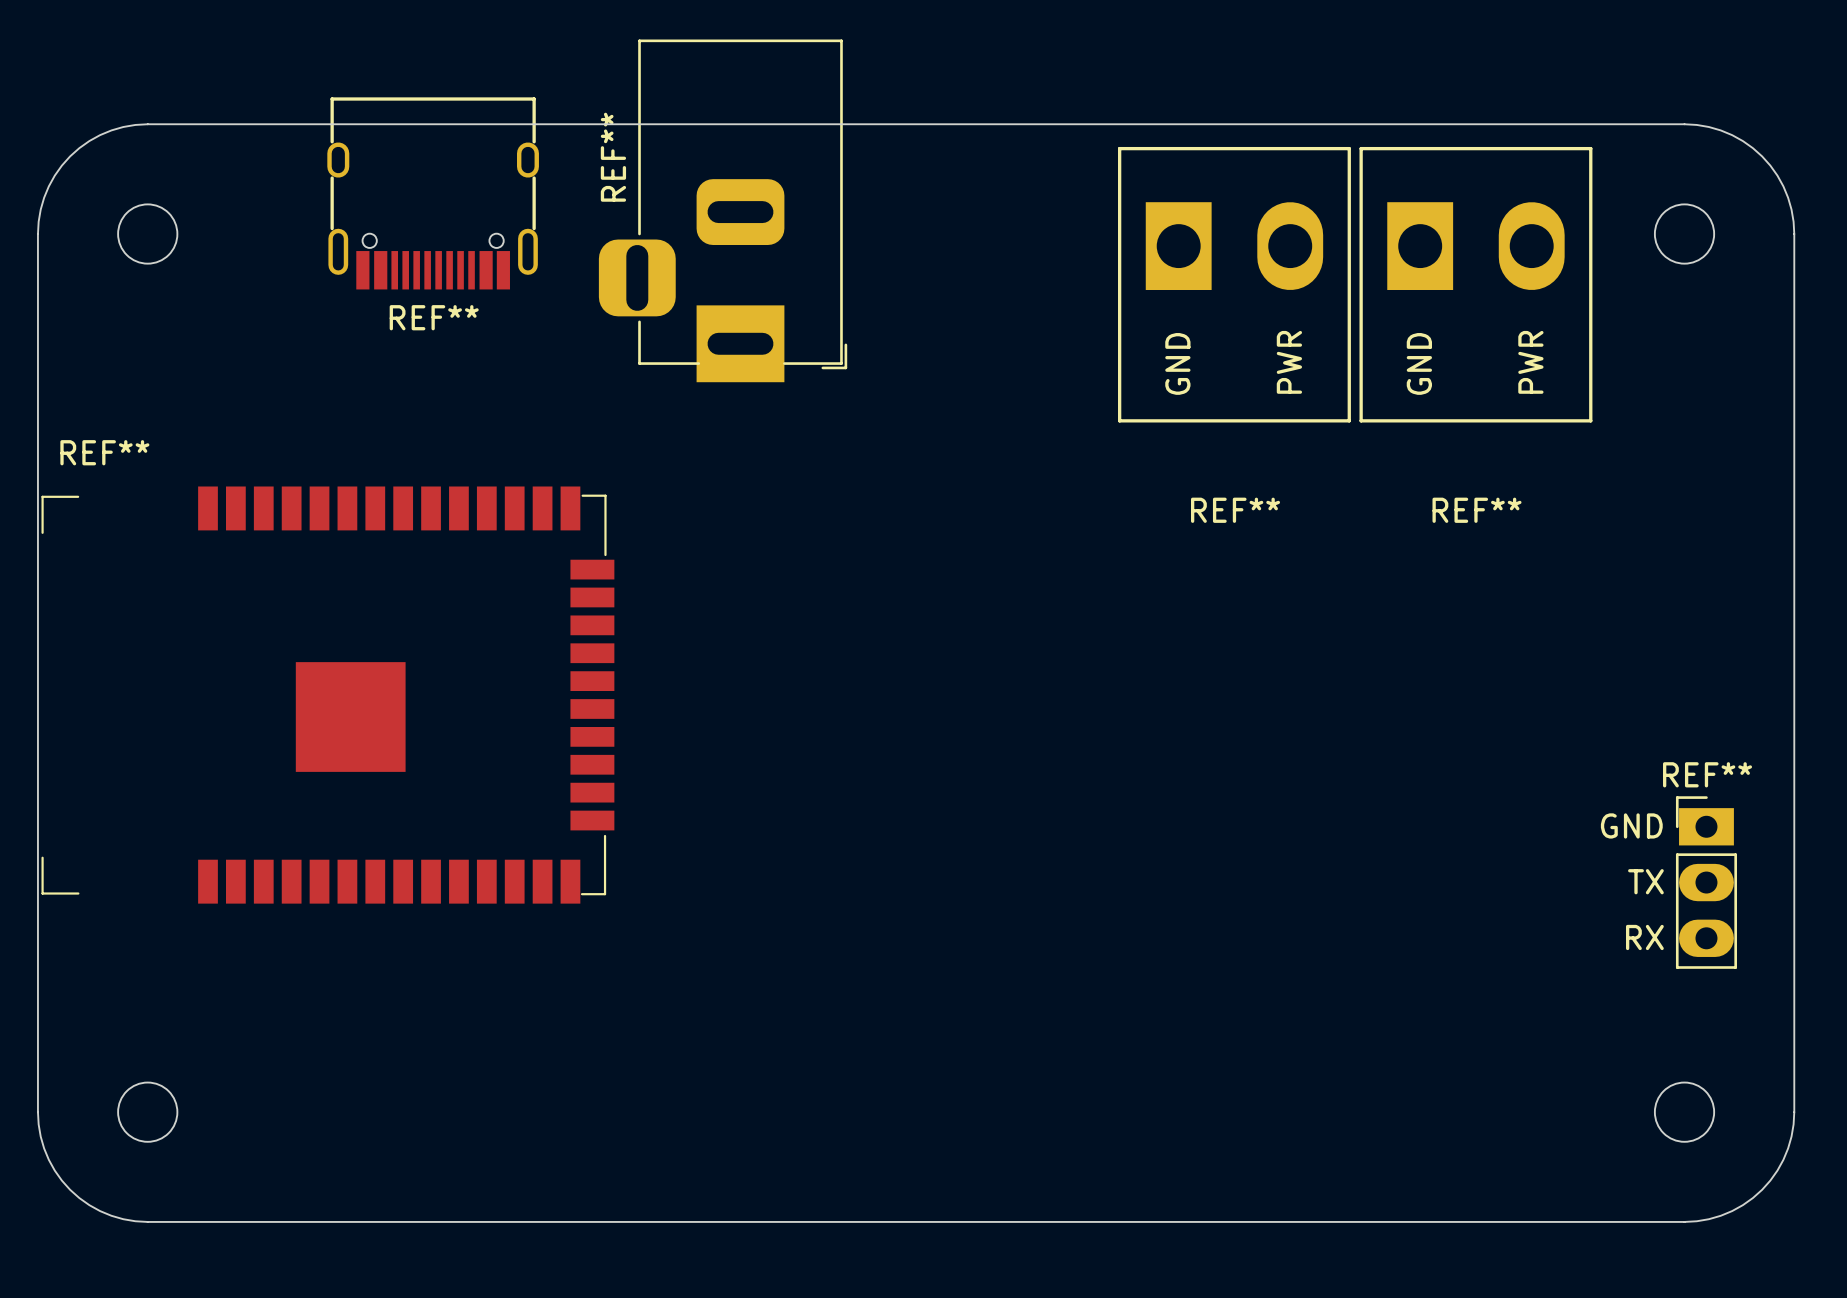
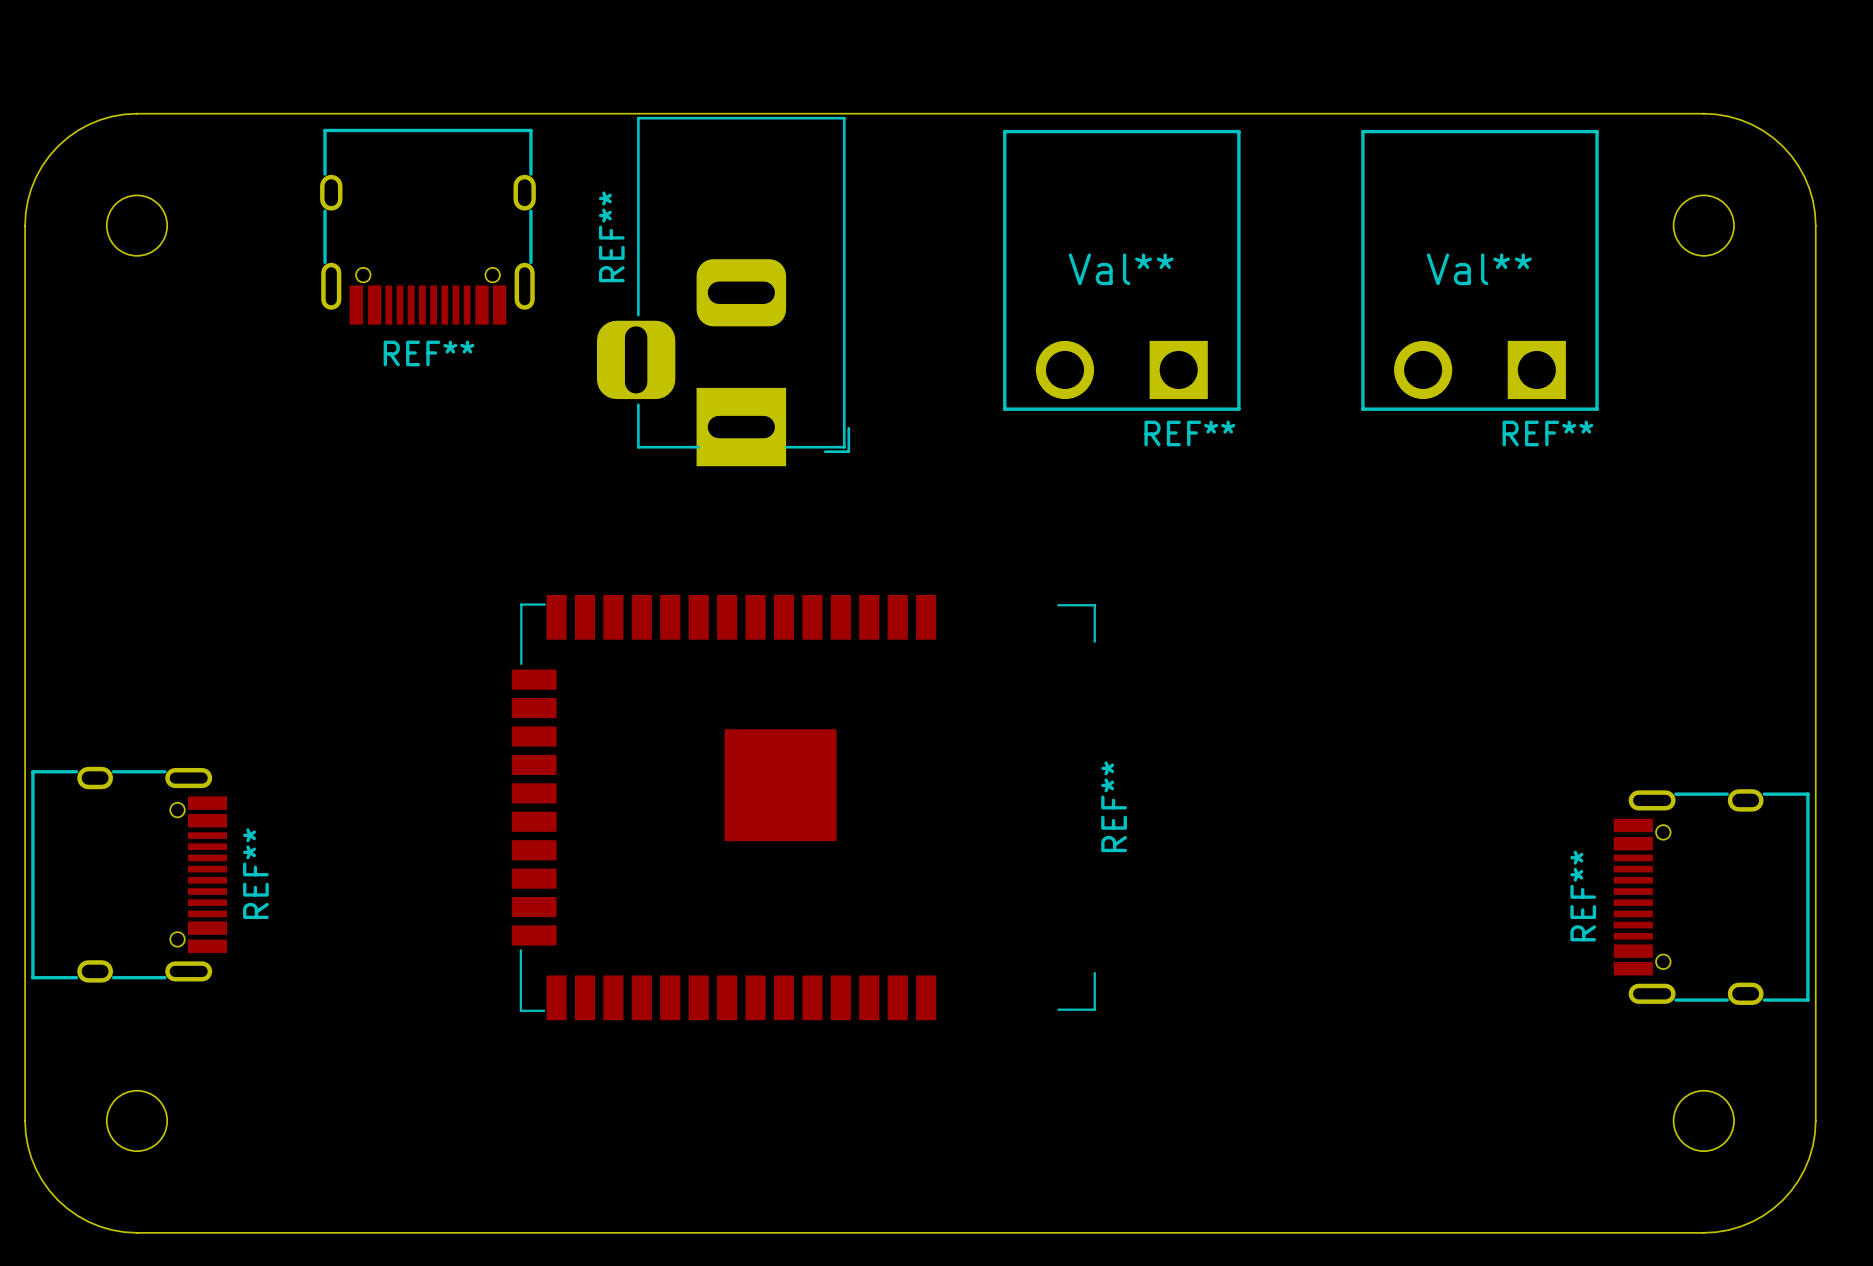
REF** footprint: [1359, 146, 1593, 423] -> [1361, 129, 1599, 411]
REF** position: (433, 193) -> (427, 226)
REF** position: (723, 210) -> (723, 291)
REF** value: none -> Val** (1479, 269)
REF**: none -> Val** (1121, 270)
REF**: (1234, 284) -> none
REF** name position: REF** (104, 452) -> REF** (1114, 806)
REF** name position: REF** (1477, 510) -> REF** (1547, 433)
REF** rotation: 0° (327, 695) -> 180° (803, 807)
REF** position: (327, 695) -> (803, 807)
REF** name position: REF** (1707, 774) -> REF** (1583, 896)
REF** footprint: [1675, 796, 1737, 969] -> [1613, 789, 1810, 1006]
REF**: none -> (129, 874)

